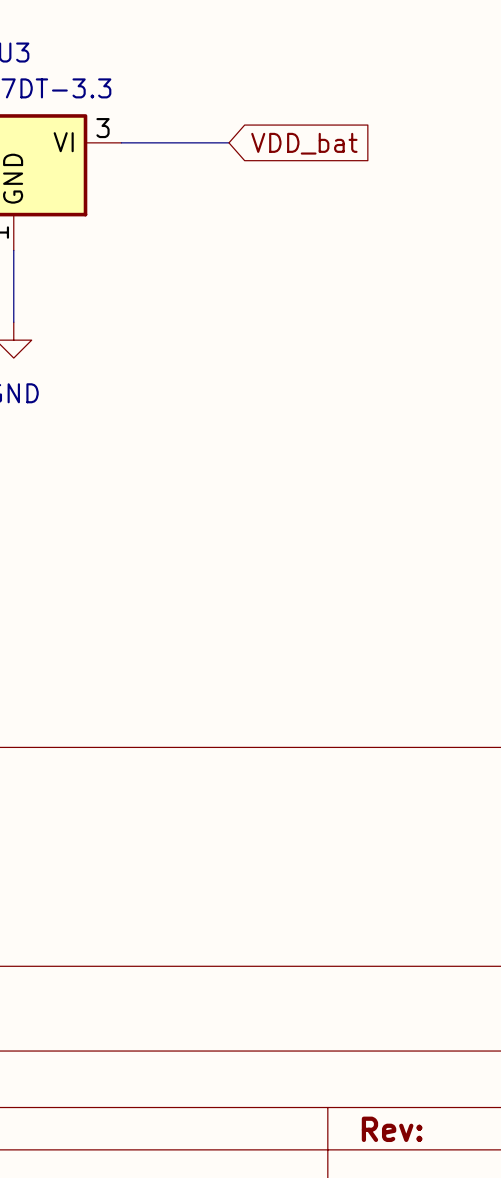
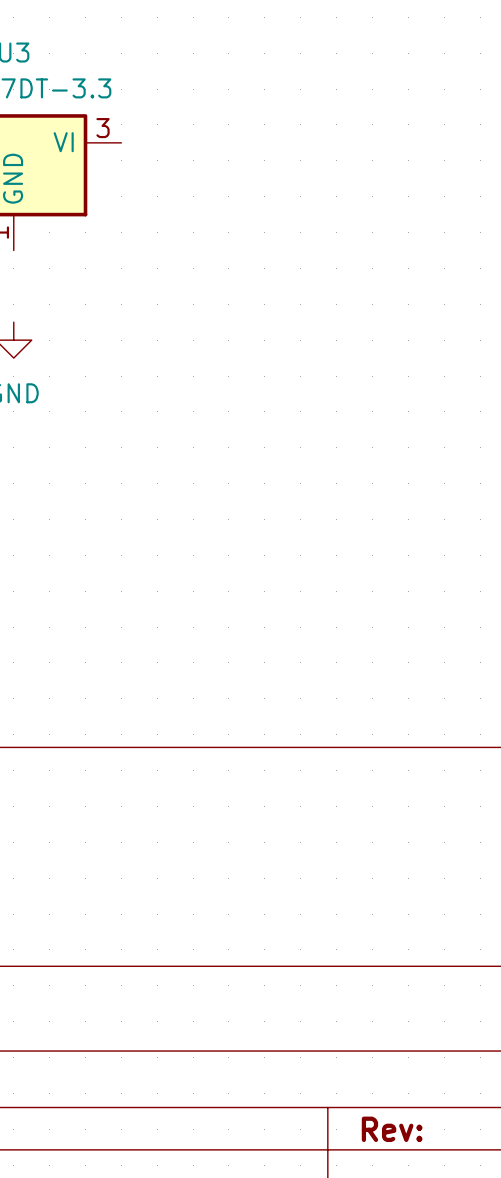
wire: (121, 142) (228, 142) -> none
global label: VDD_bat (304, 143) -> none
wire: (13, 250) (13, 322) -> none

